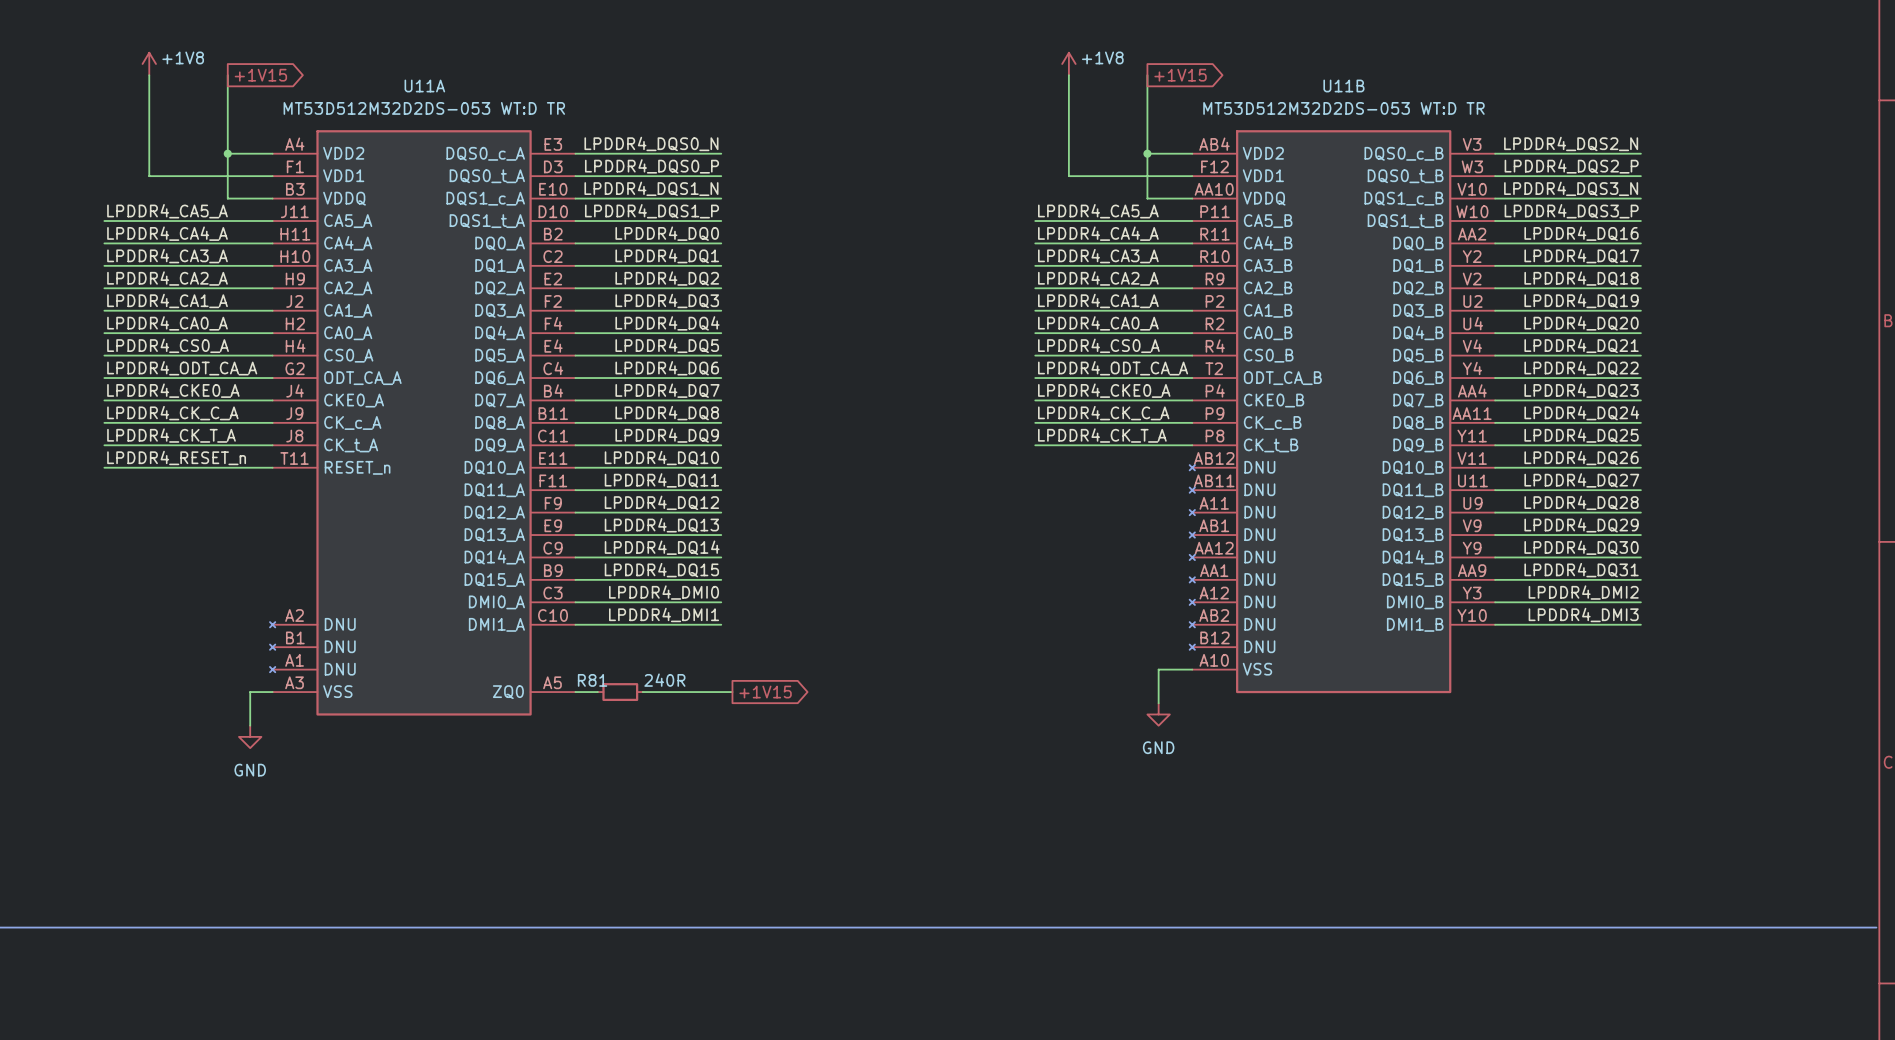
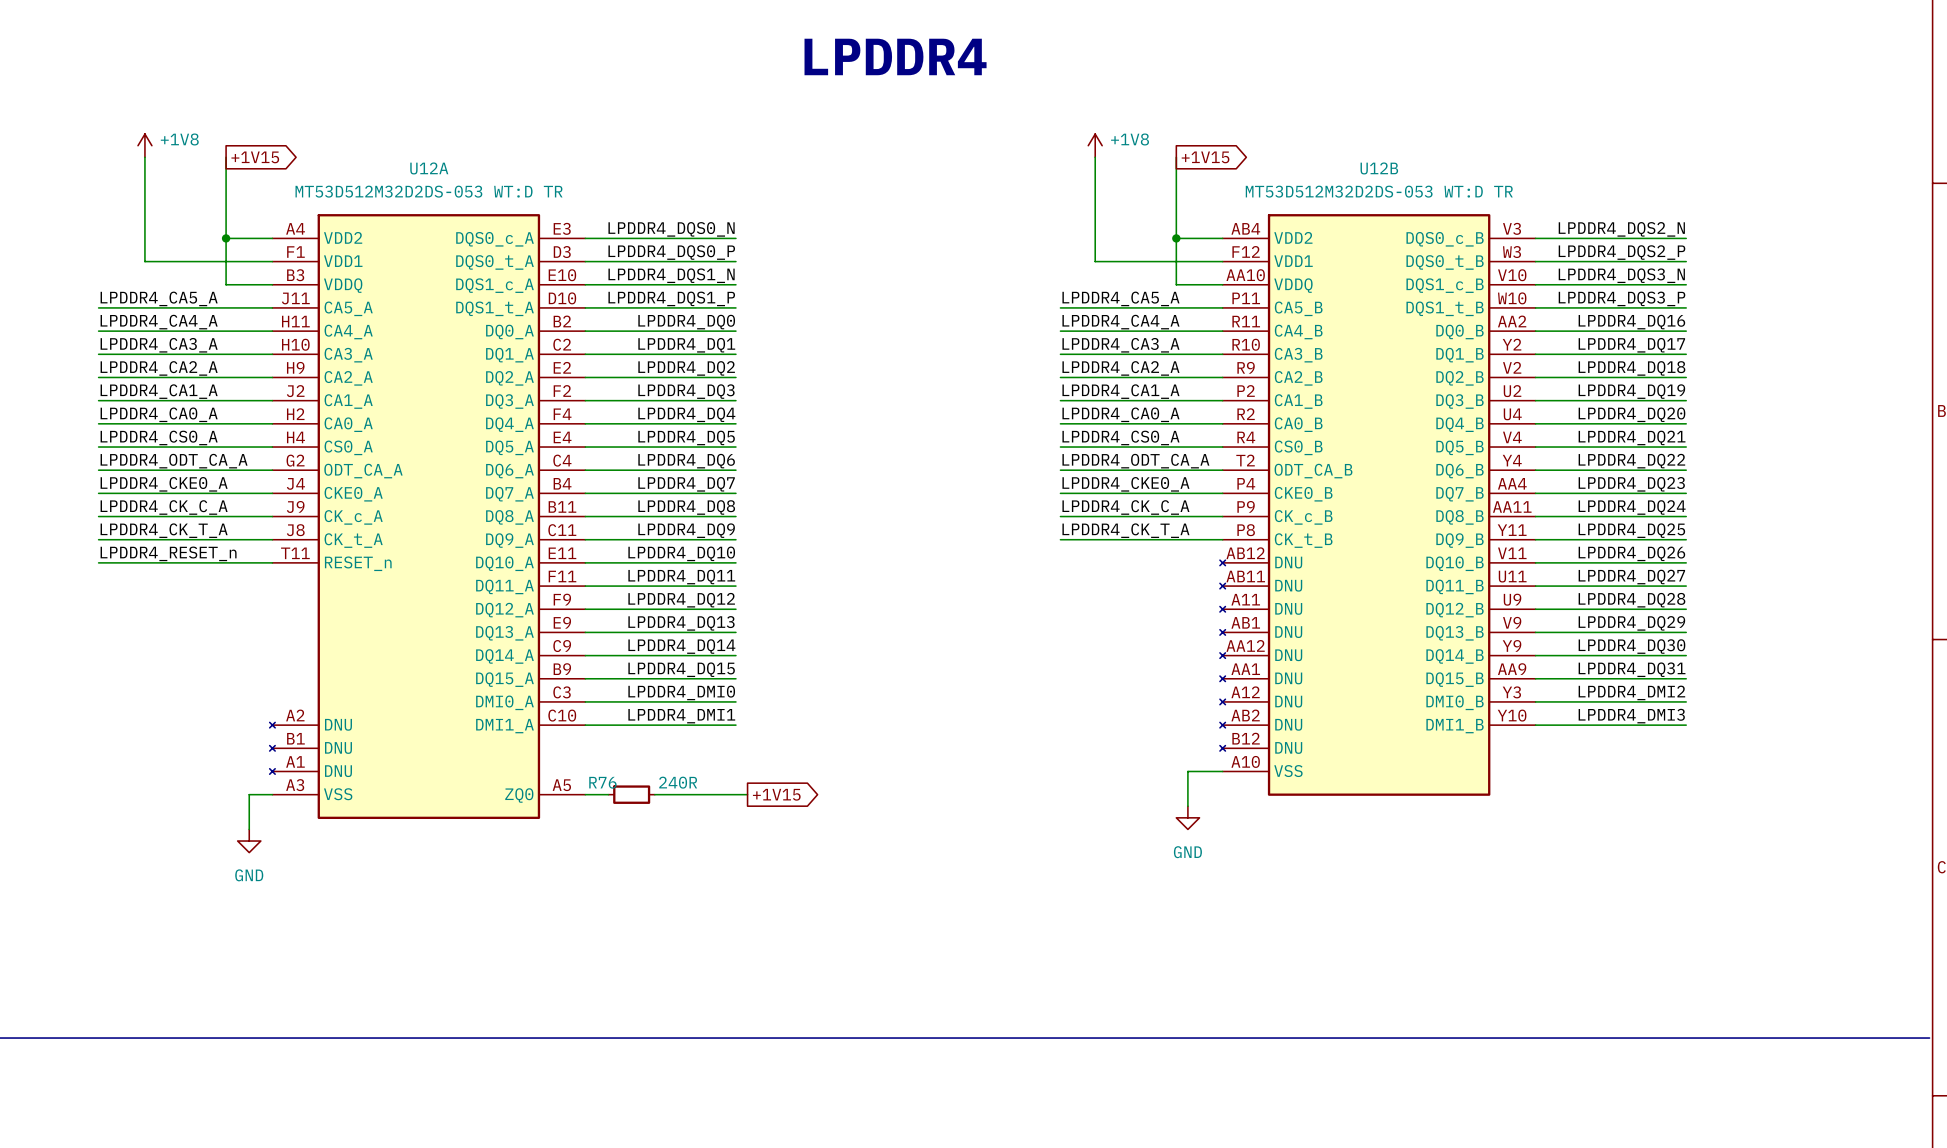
U11A name: U11A (424, 85) -> U12A (429, 168)
U11B name: U11B (1343, 85) -> U12B (1379, 168)
R81 name: R81 (592, 680) -> R76 (602, 782)

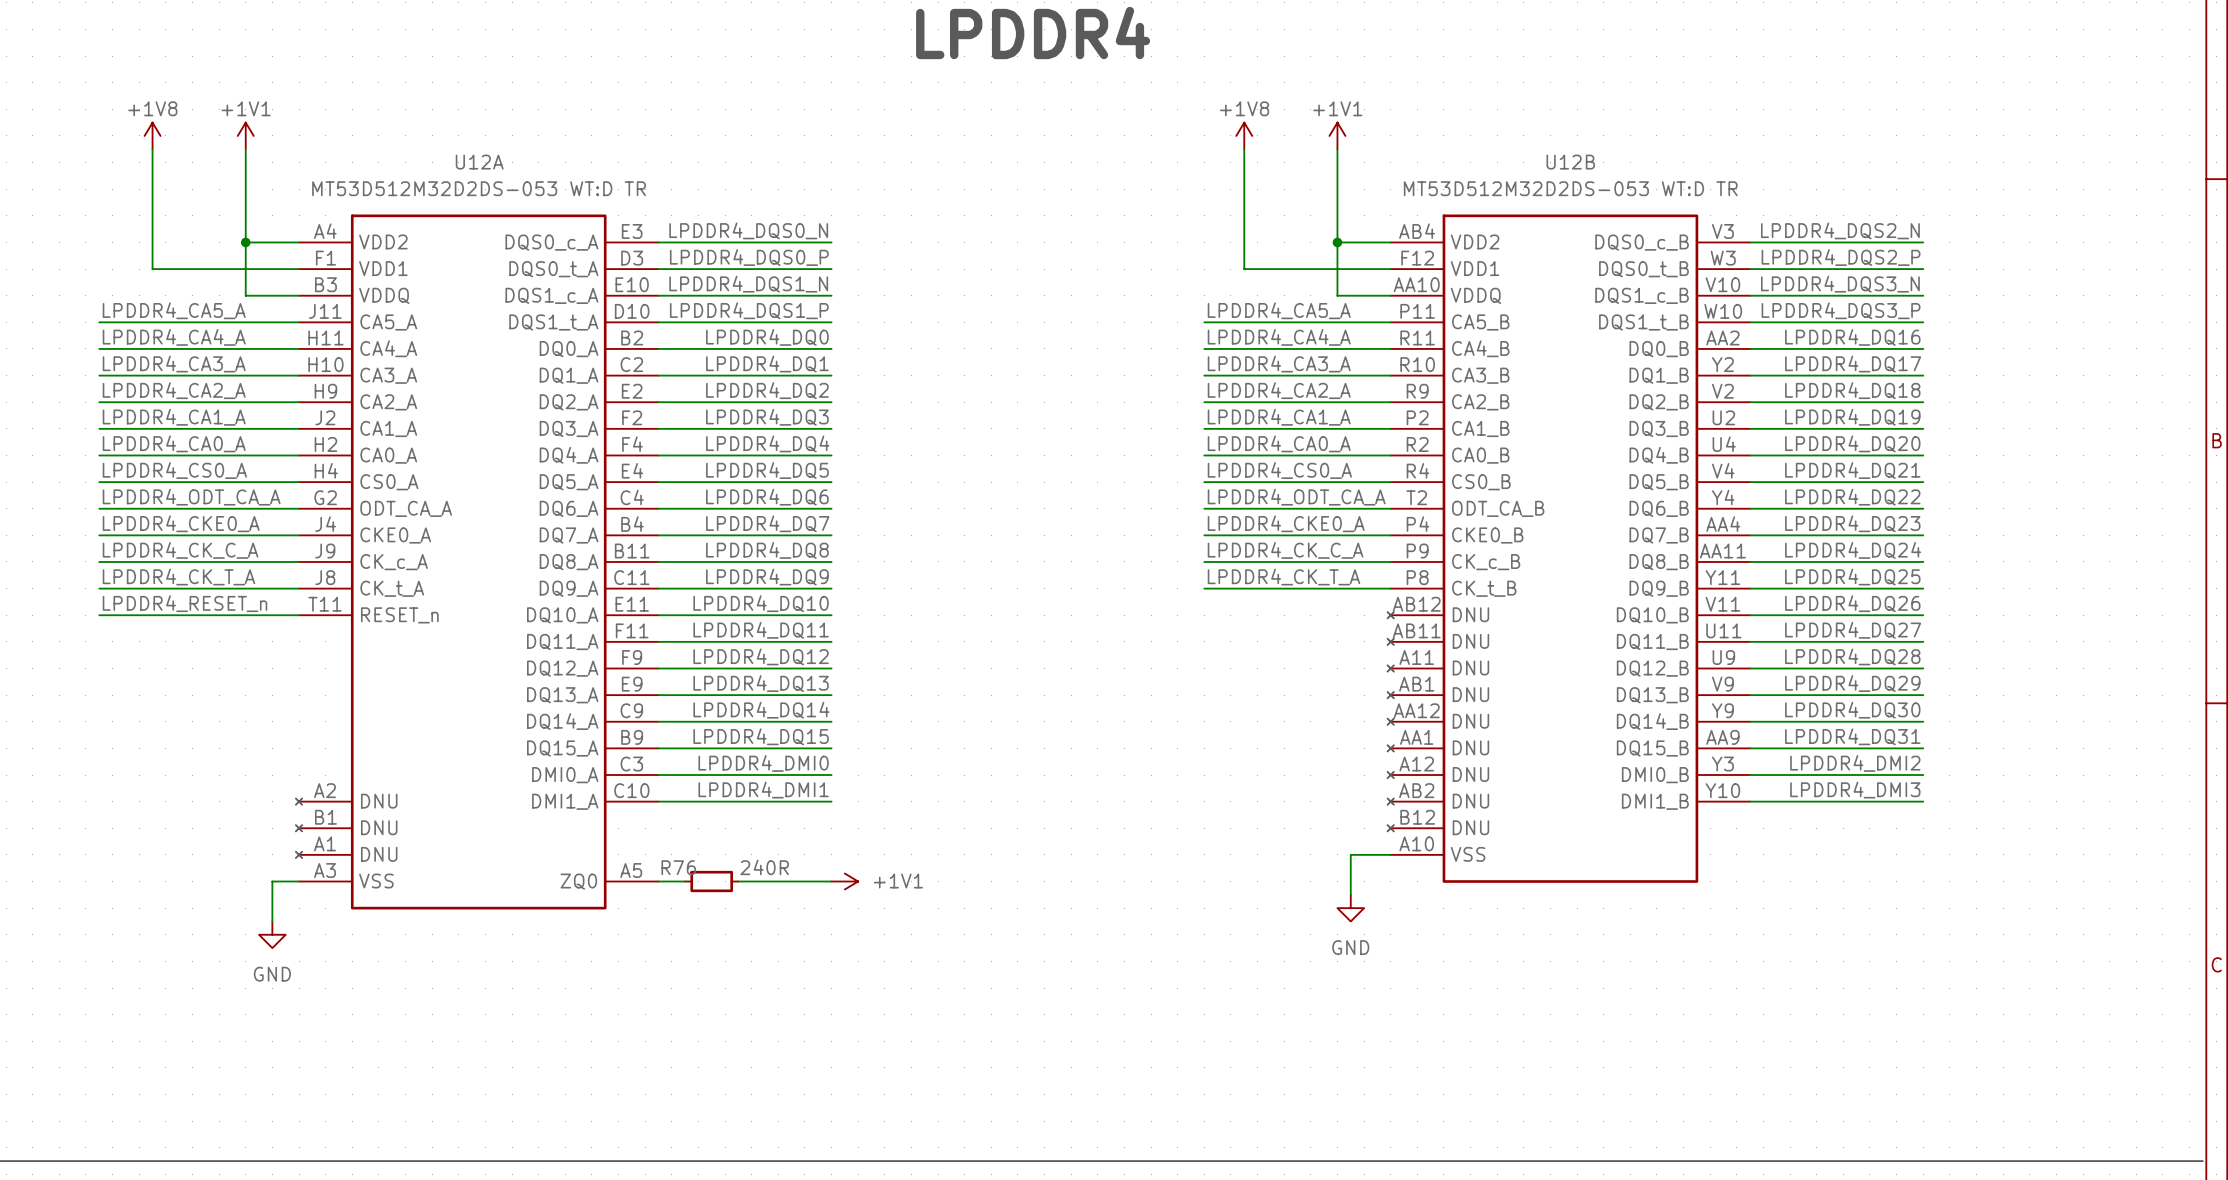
power symbol text position: +1V8 (179, 139) -> +1V8 (152, 108)
power symbol text position: +1V8 (1130, 139) -> +1V8 (1244, 108)
power symbol: none -> +1V1 (245, 135)
power symbol: none -> +1V1 (1337, 135)
global label: +1V15 (255, 157) -> none
global label: +1V15 (1205, 157) -> none
power symbol: none -> +1V1 (844, 881)
global label: +1V15 (776, 794) -> none

